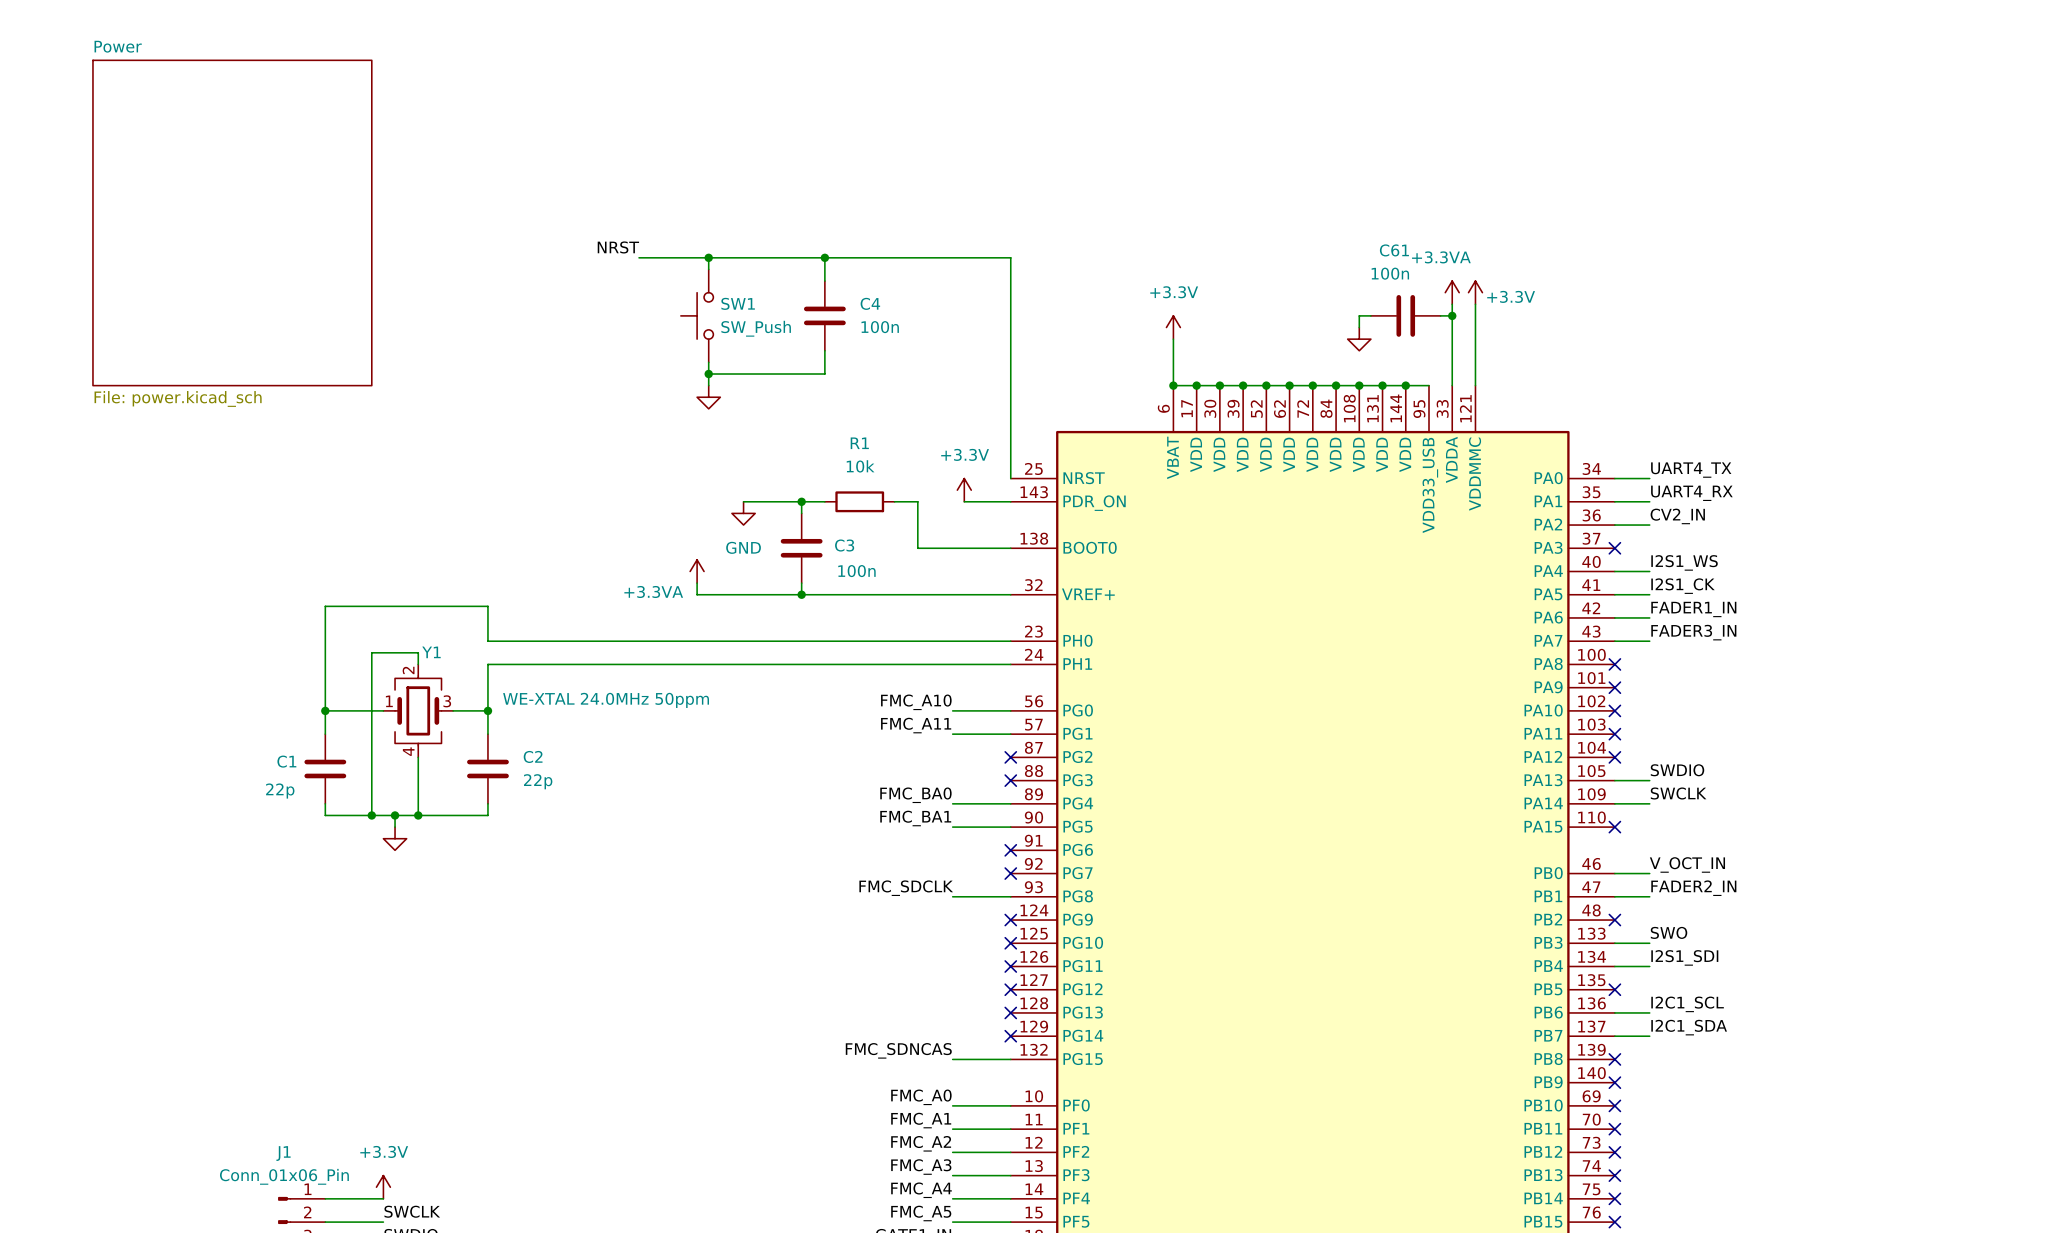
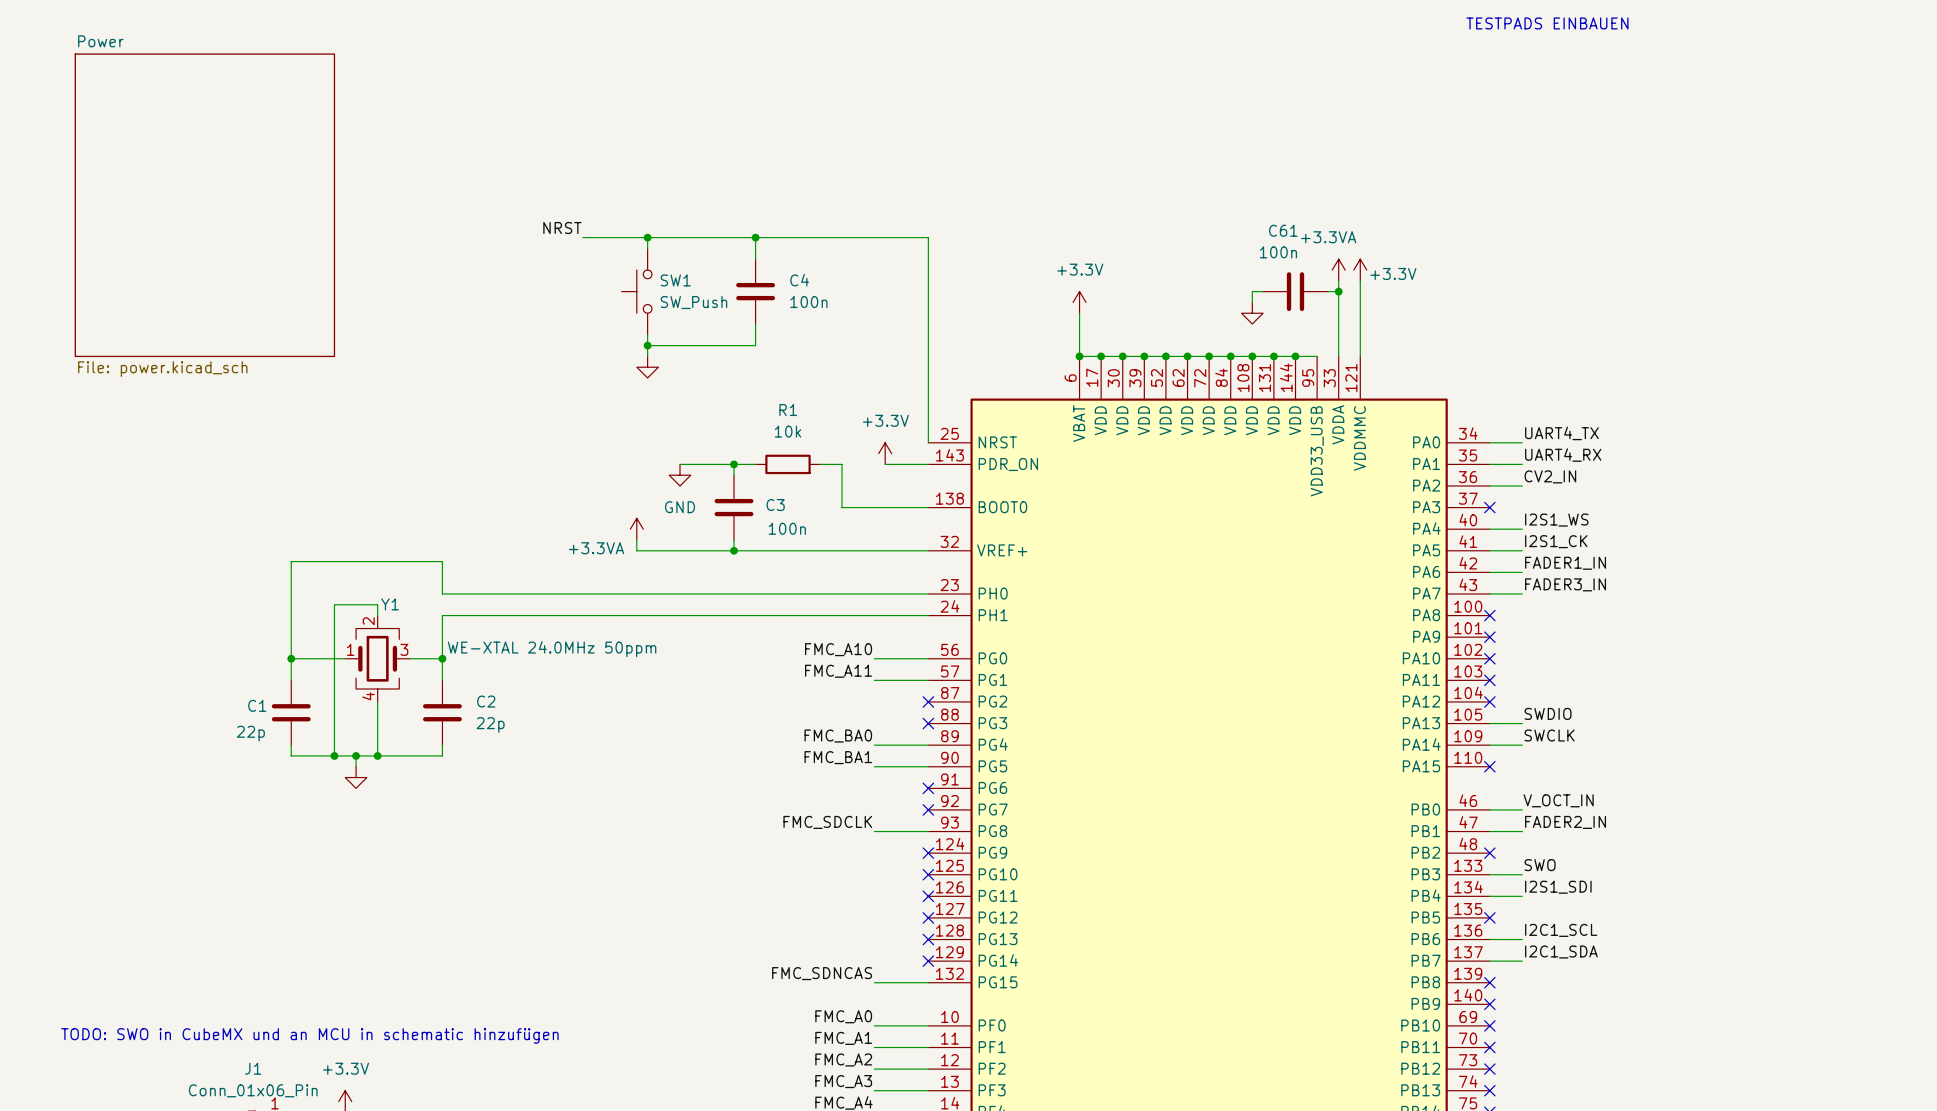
text: none -> TESTPADS EINBAUEN (1547, 23)
text: none -> TODO: SWO in CubeMX und an MCU in schematic hinzufügen (309, 1035)

